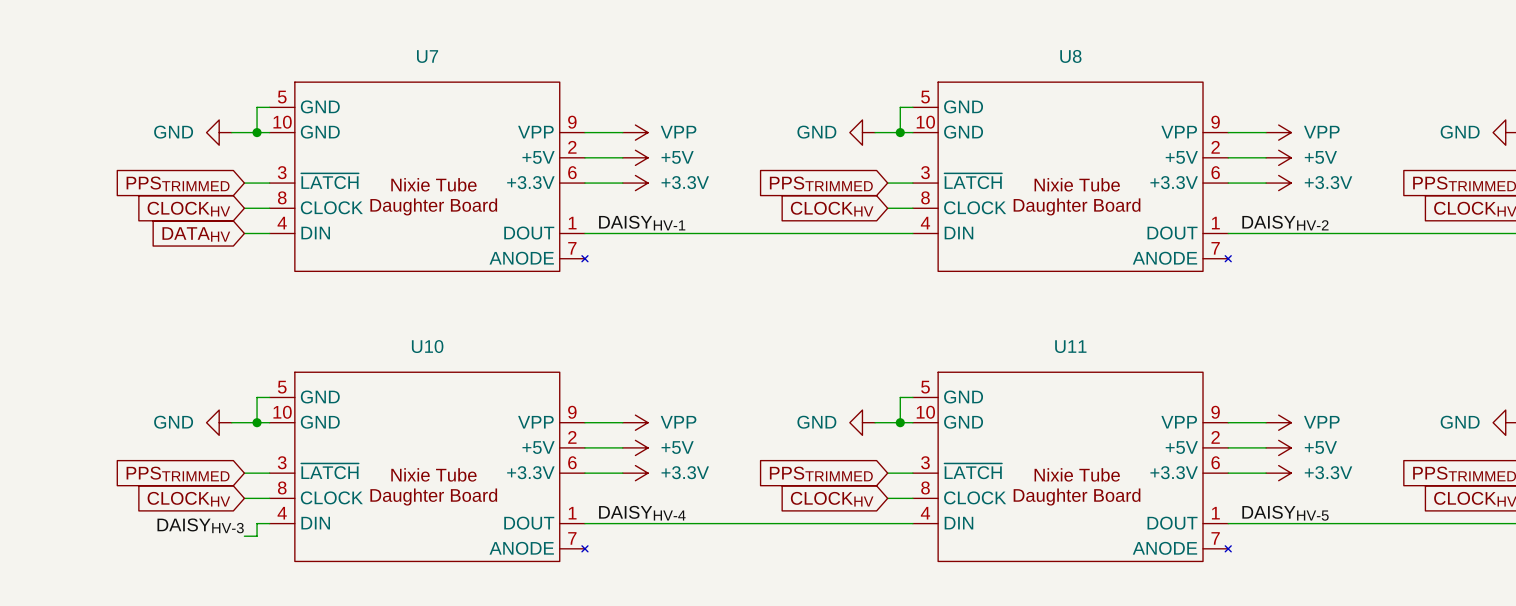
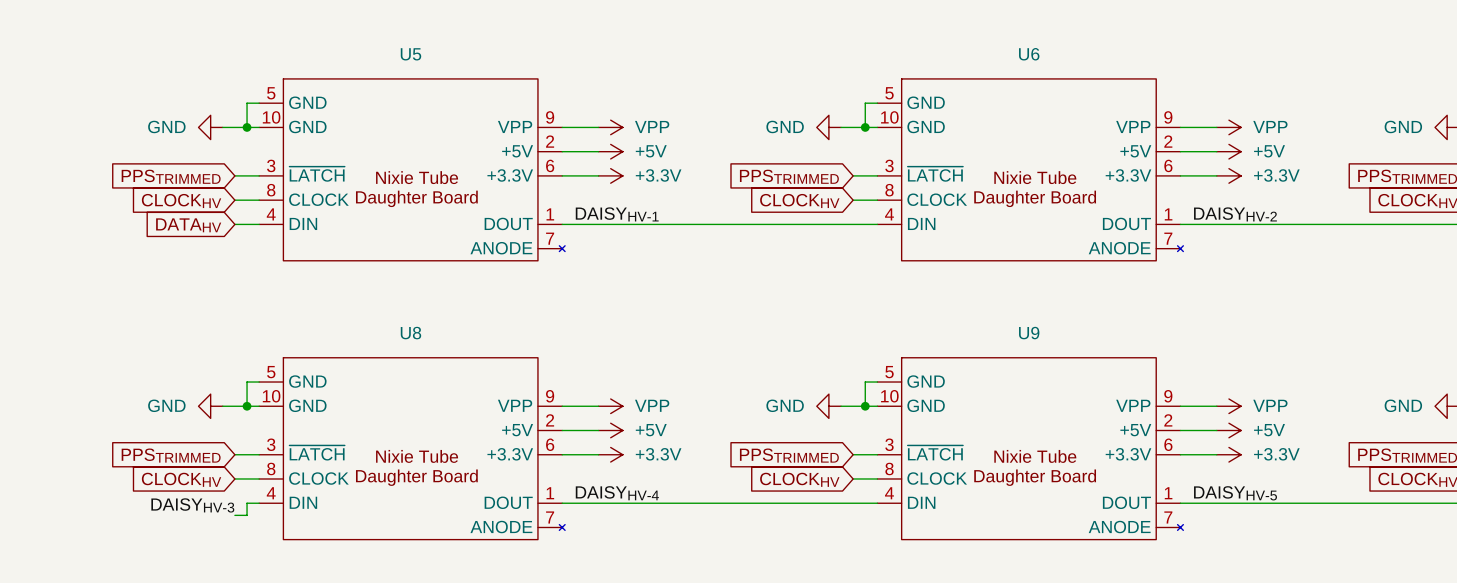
U7 name: U7 (427, 56) -> U5 (410, 54)
U8 name: U8 (1070, 56) -> U6 (1029, 54)
U10 name: U10 (427, 346) -> U8 (410, 333)
U11 name: U11 (1070, 346) -> U9 (1029, 333)

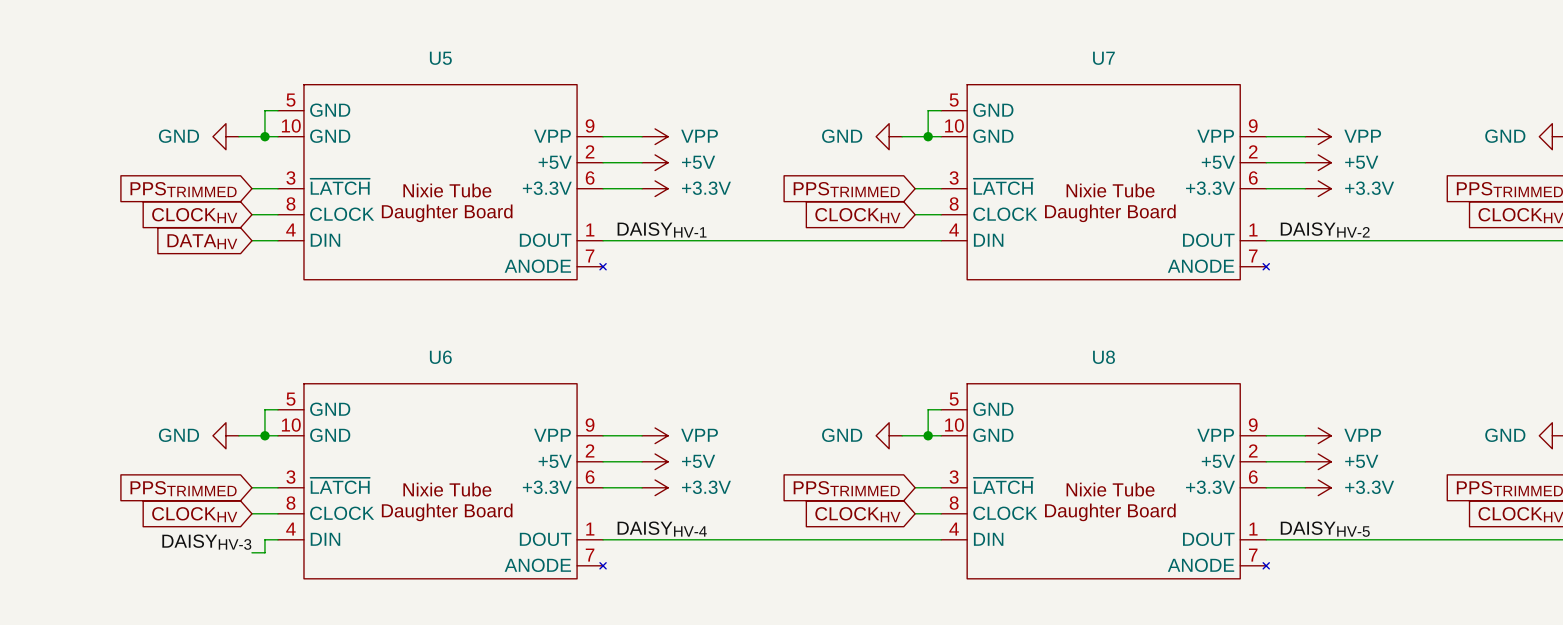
U6 name: U6 (1029, 54) -> U7 (1103, 58)
U8 name: U8 (410, 333) -> U6 (440, 357)
U9 name: U9 (1029, 333) -> U8 (1104, 357)

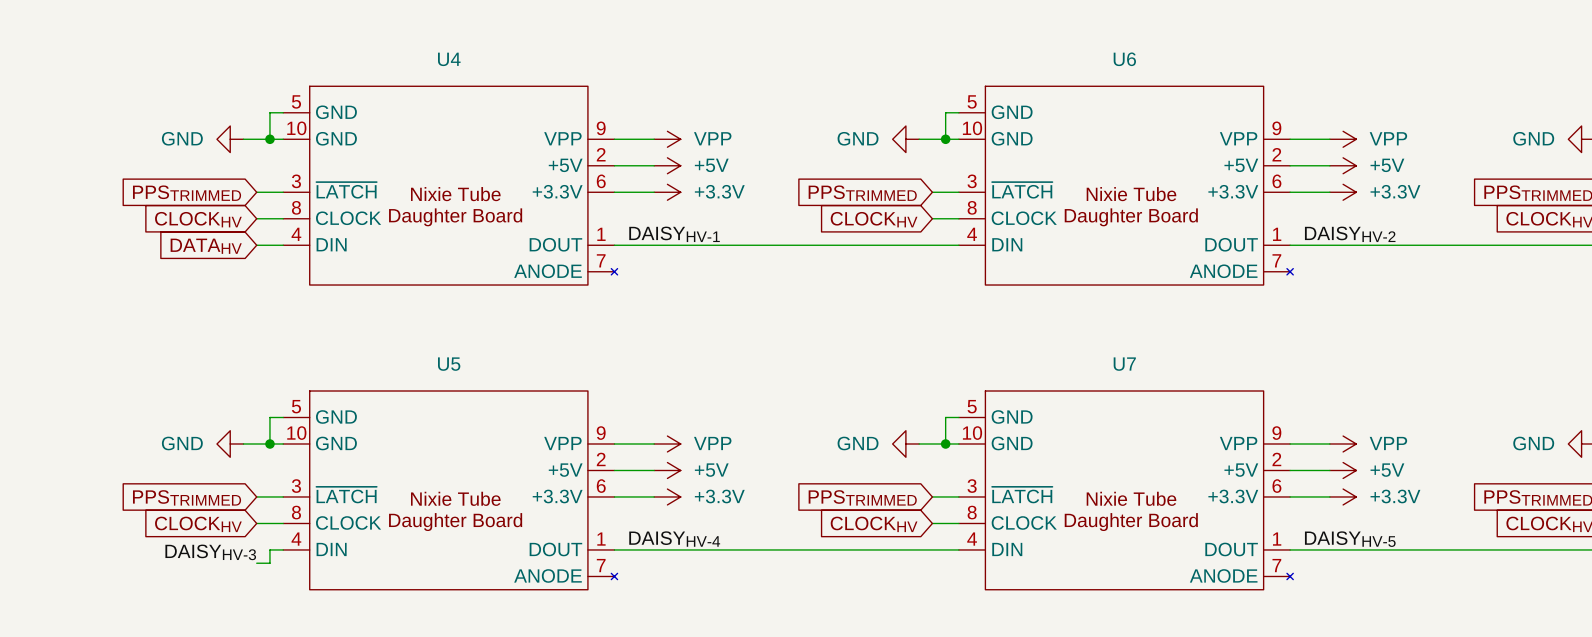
U5 name: U5 (440, 58) -> U4 (449, 59)
U7 name: U7 (1103, 58) -> U6 (1124, 59)
U6 name: U6 (440, 357) -> U5 (449, 364)
U8 name: U8 (1104, 357) -> U7 (1124, 364)

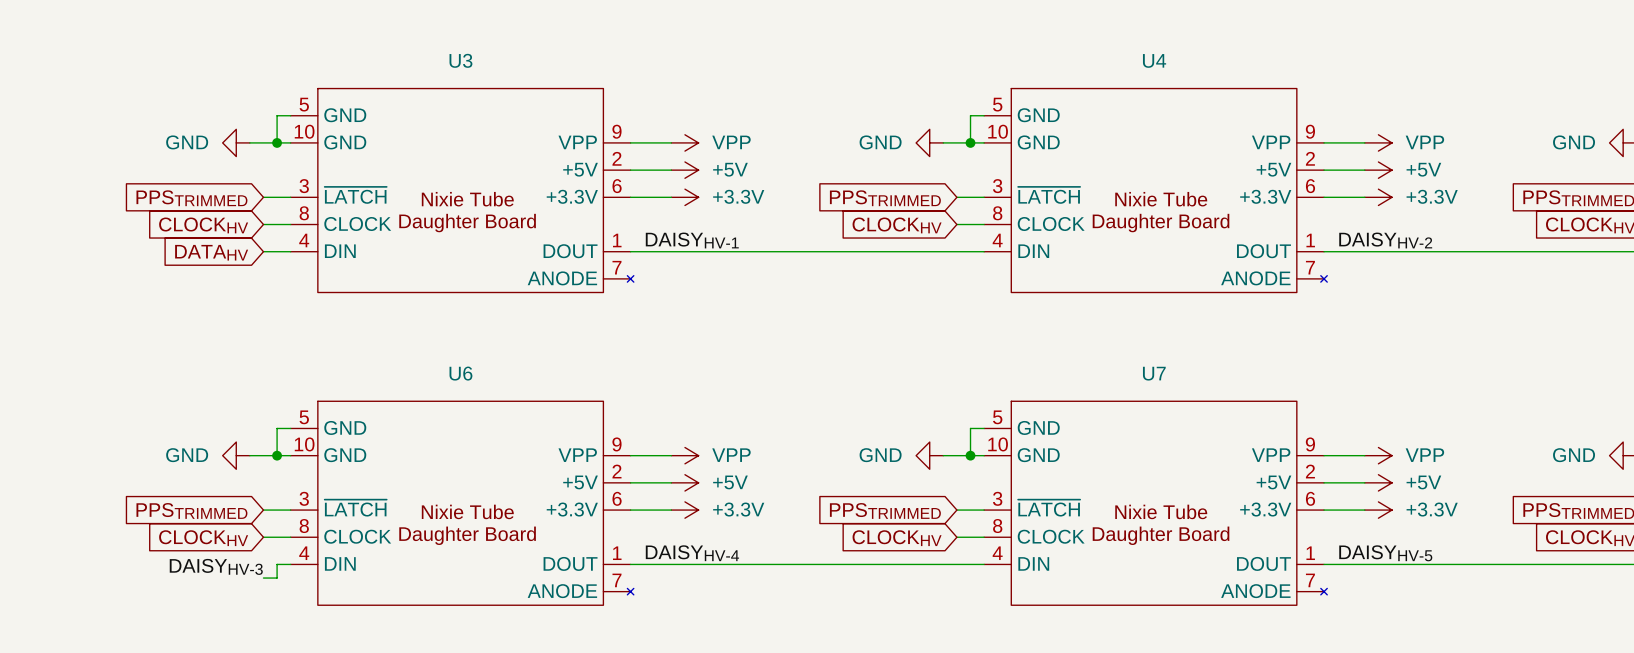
U4 name: U4 (449, 59) -> U3 (460, 60)
U6 name: U6 (1124, 59) -> U4 (1154, 60)
U5 name: U5 (449, 364) -> U6 (460, 373)

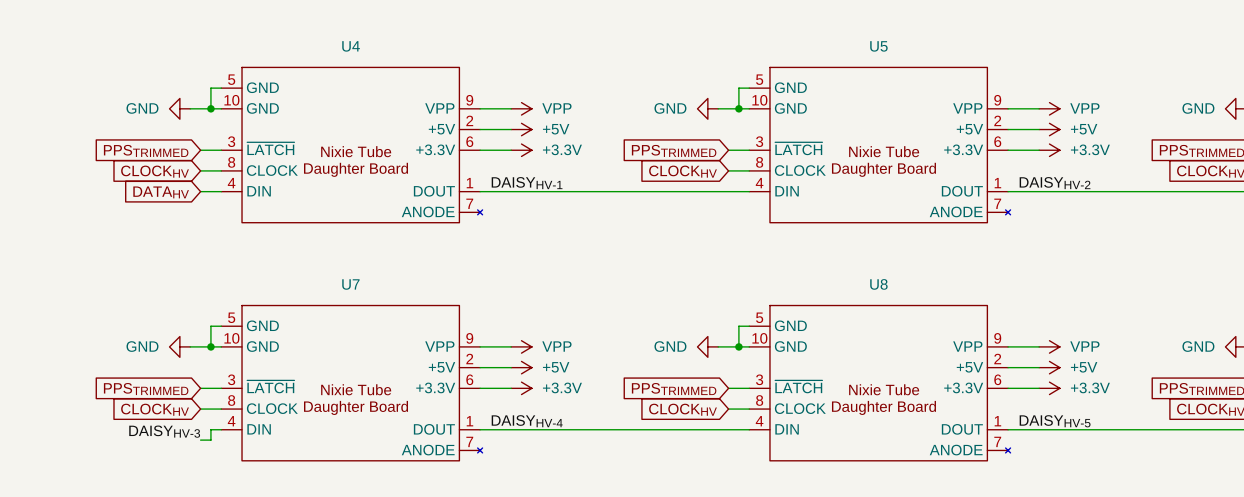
U3 name: U3 (460, 60) -> U4 (351, 46)
U4 name: U4 (1154, 60) -> U5 (878, 46)
U6 name: U6 (460, 373) -> U7 (350, 284)
U7 name: U7 (1154, 373) -> U8 (878, 284)

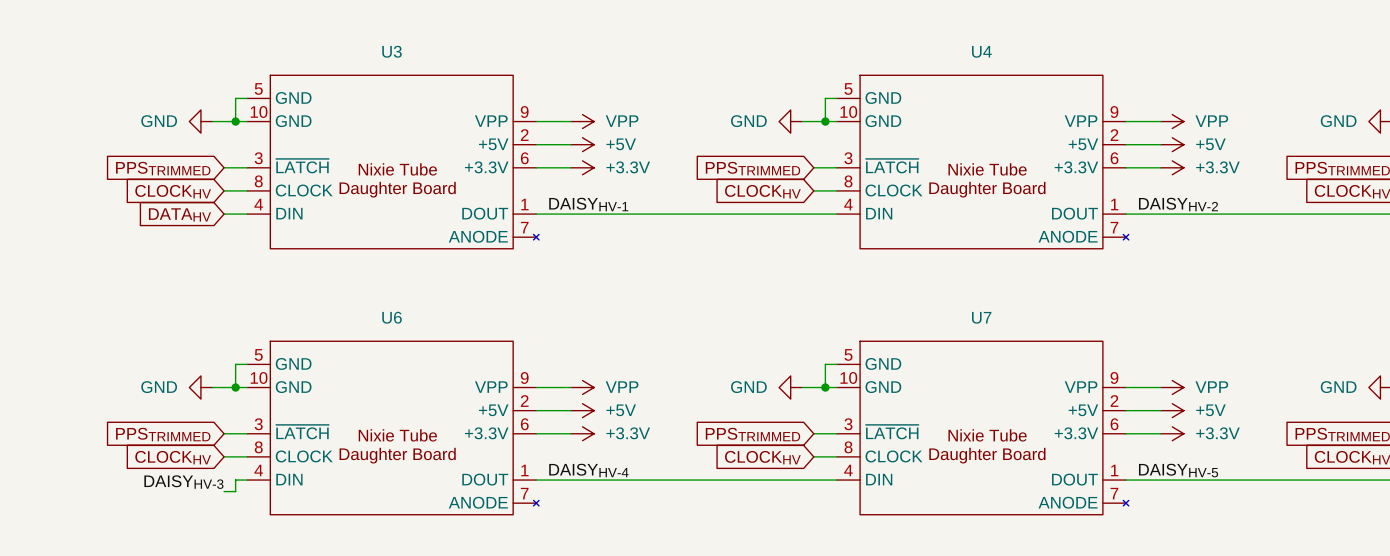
U4 name: U4 (351, 46) -> U3 (392, 51)
U5 name: U5 (878, 46) -> U4 (981, 51)
U7 name: U7 (350, 284) -> U6 (392, 317)
U8 name: U8 (878, 284) -> U7 (981, 317)

